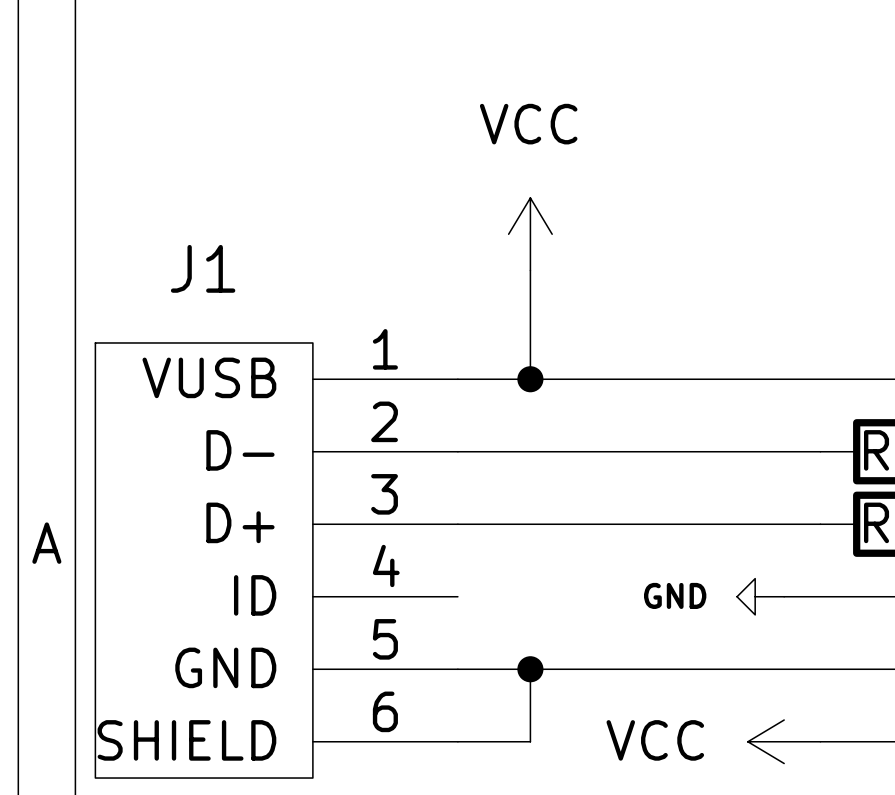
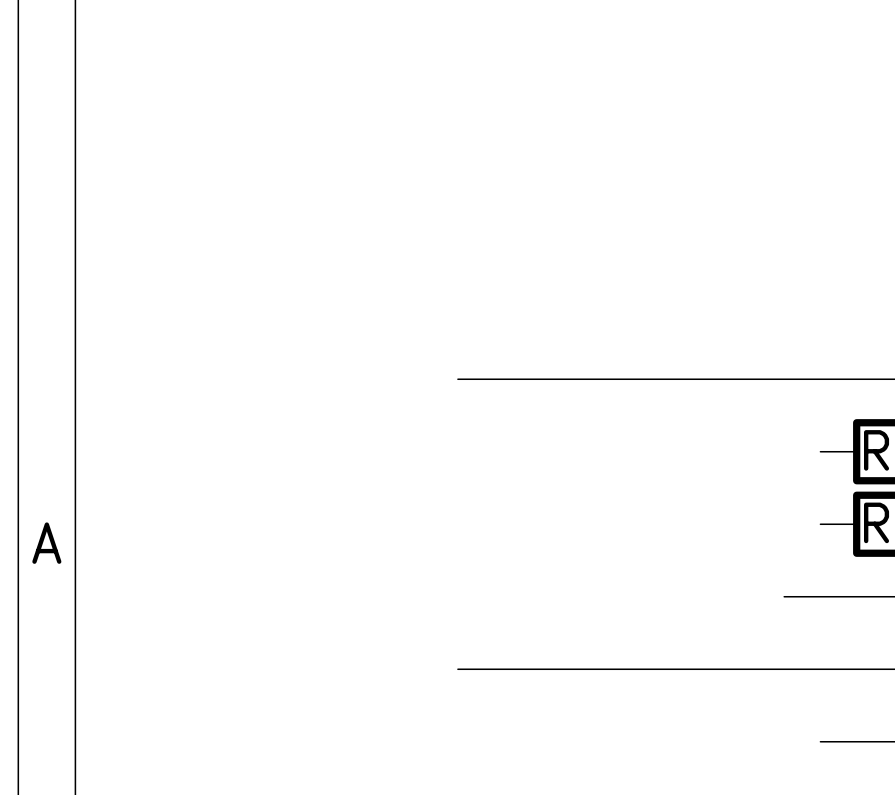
power symbol: VCC (530, 234) -> none
wire: (530, 270) (530, 379) -> none
junction: (530, 379) -> none
wire: (457, 451) (820, 451) -> none
wire: (457, 524) (820, 524) -> none
J1: (276, 560) -> none
power symbol: GND (760, 596) -> none
wire: (530, 669) (530, 741) (457, 741) -> none
junction: (530, 669) -> none
power symbol: VCC (784, 741) -> none

